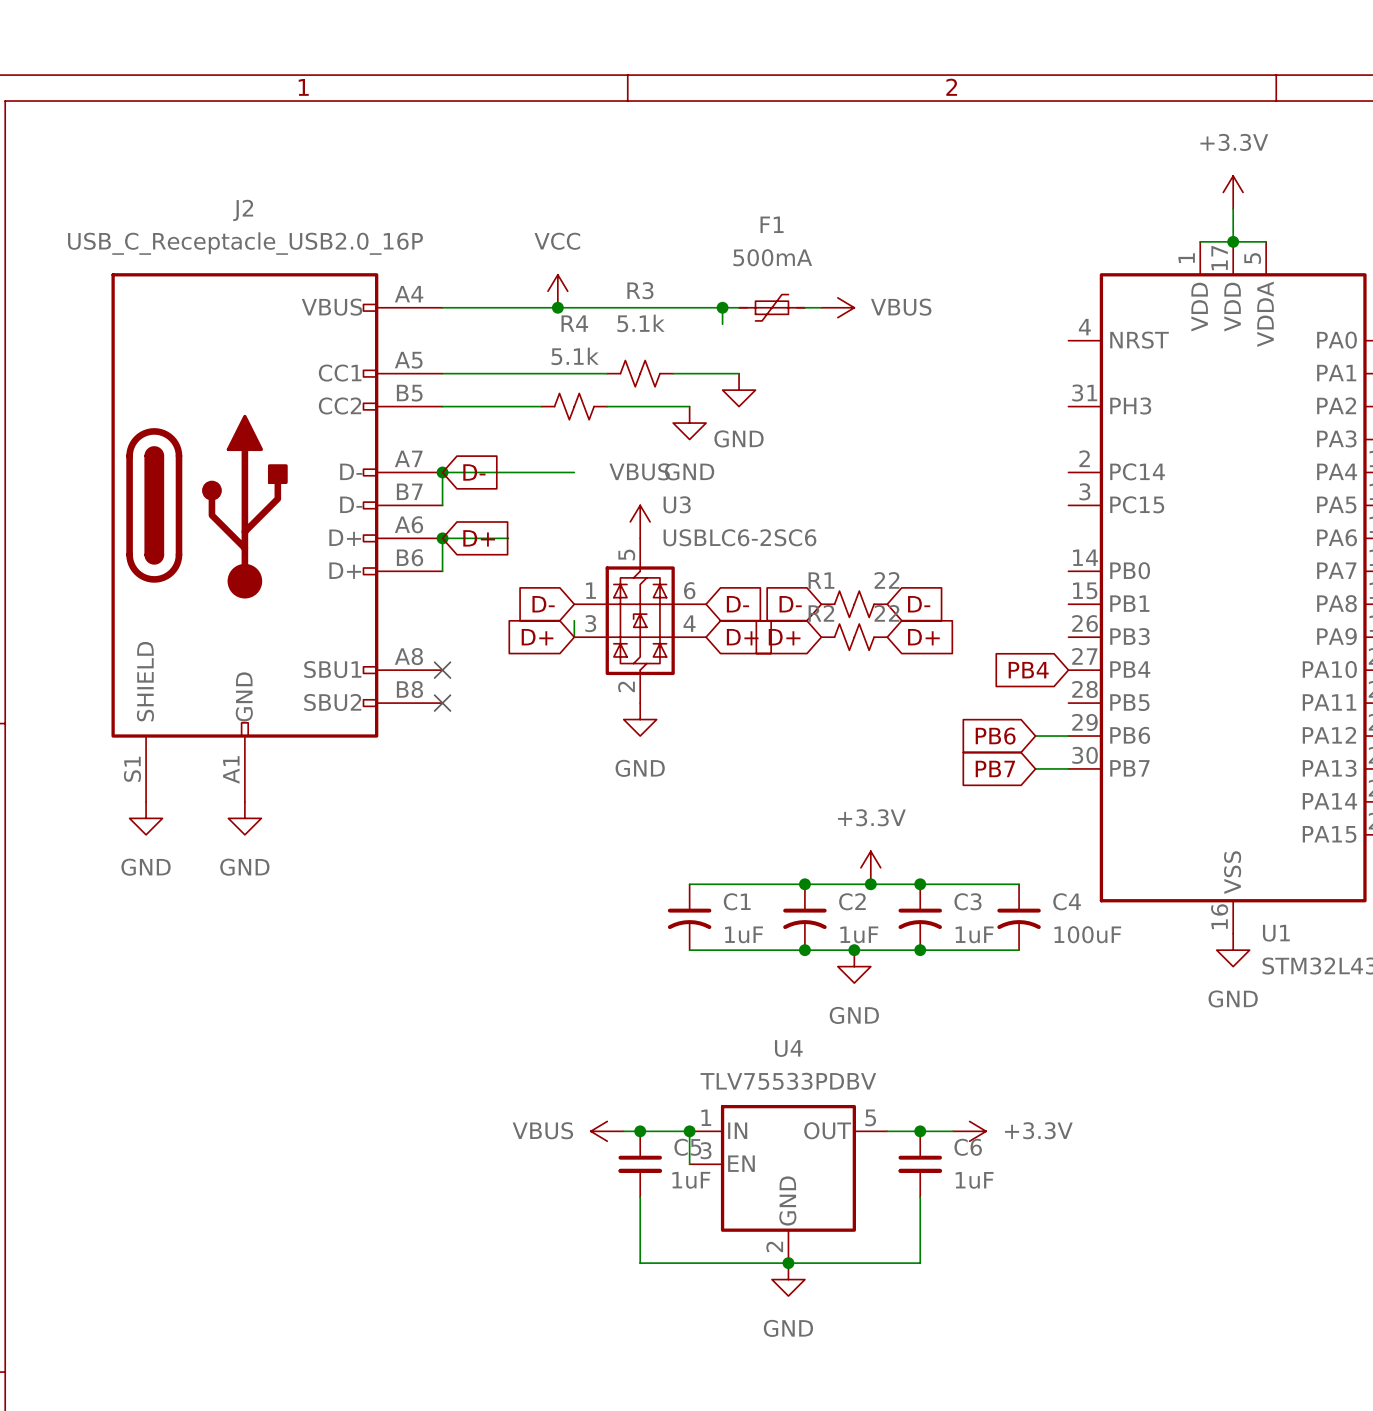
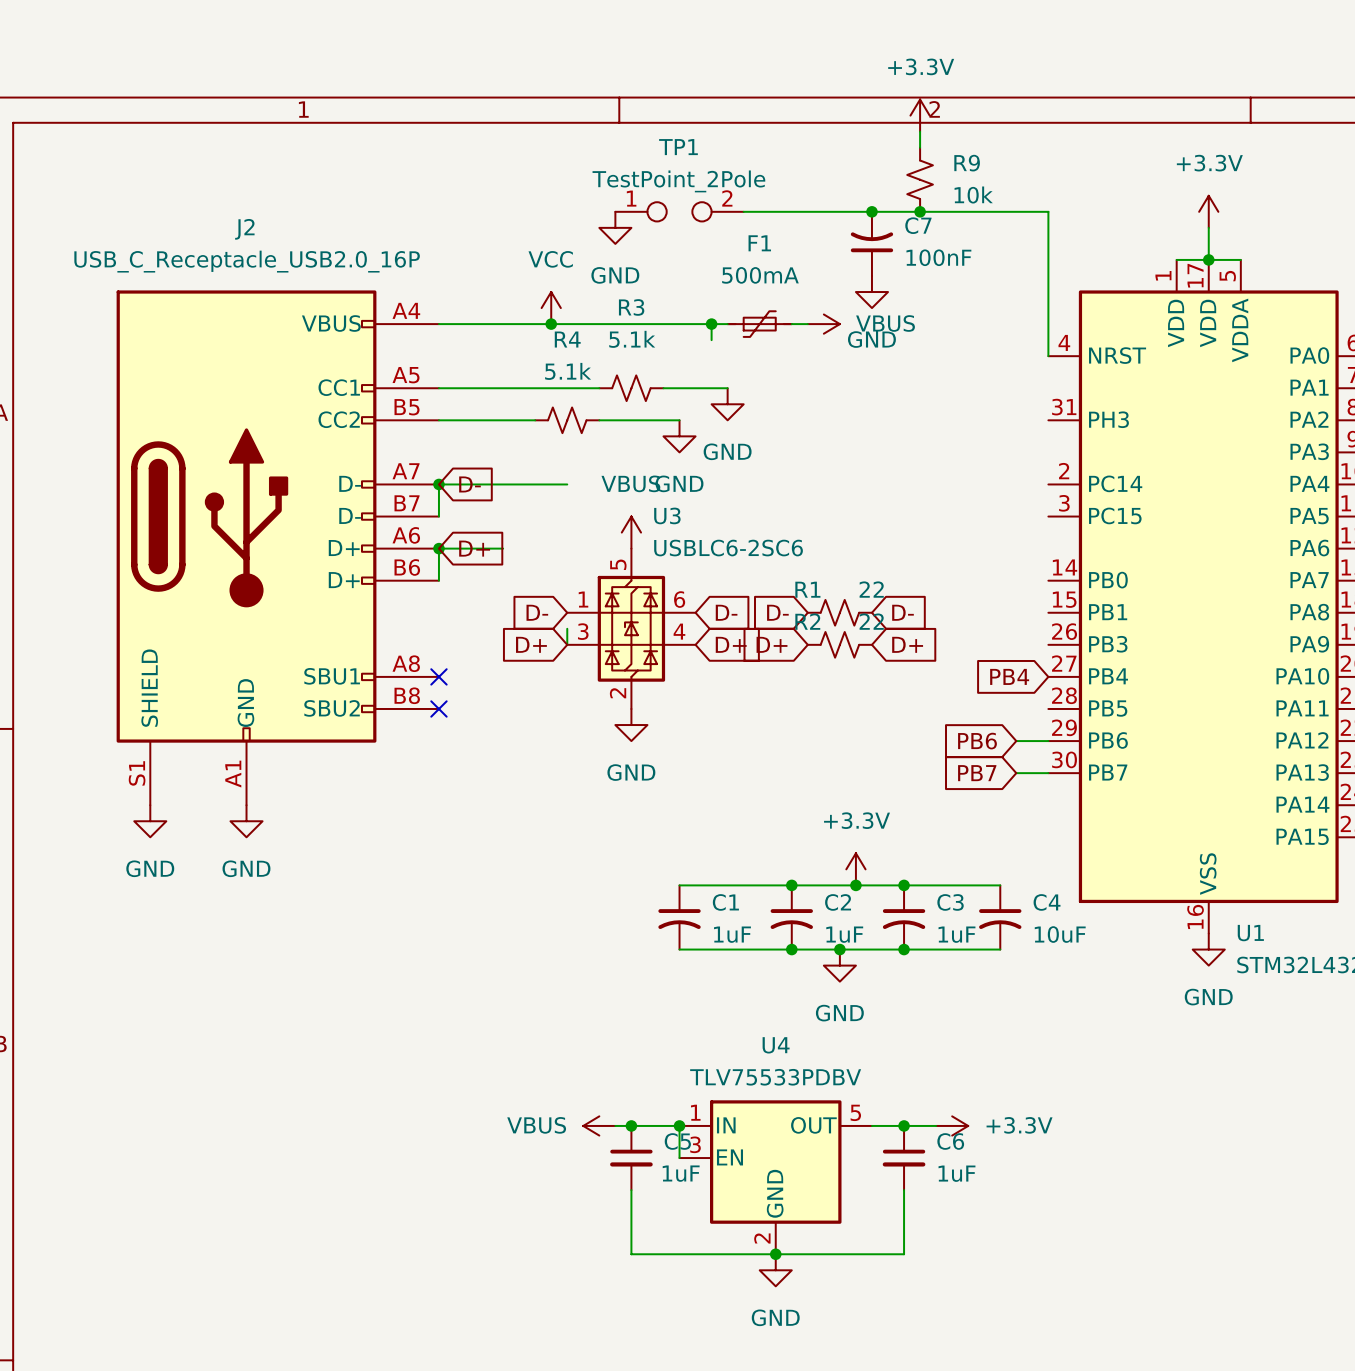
power symbol: none -> +3.3V (920, 115)
wire: none -> (920, 131) (920, 147)
R9: none -> 10k (920, 179)
TP1: none -> TestPoint_2Pole (679, 211)
wire: none -> (743, 211) (1048, 211) (1048, 356)
junction: none -> (871, 211)
junction: none -> (920, 211)
power symbol: none -> GND (615, 227)
C7: none -> 100nF (871, 243)
power symbol: none -> GND (871, 292)
C4 value: 100uF (1087, 934) -> 10uF (1060, 934)

